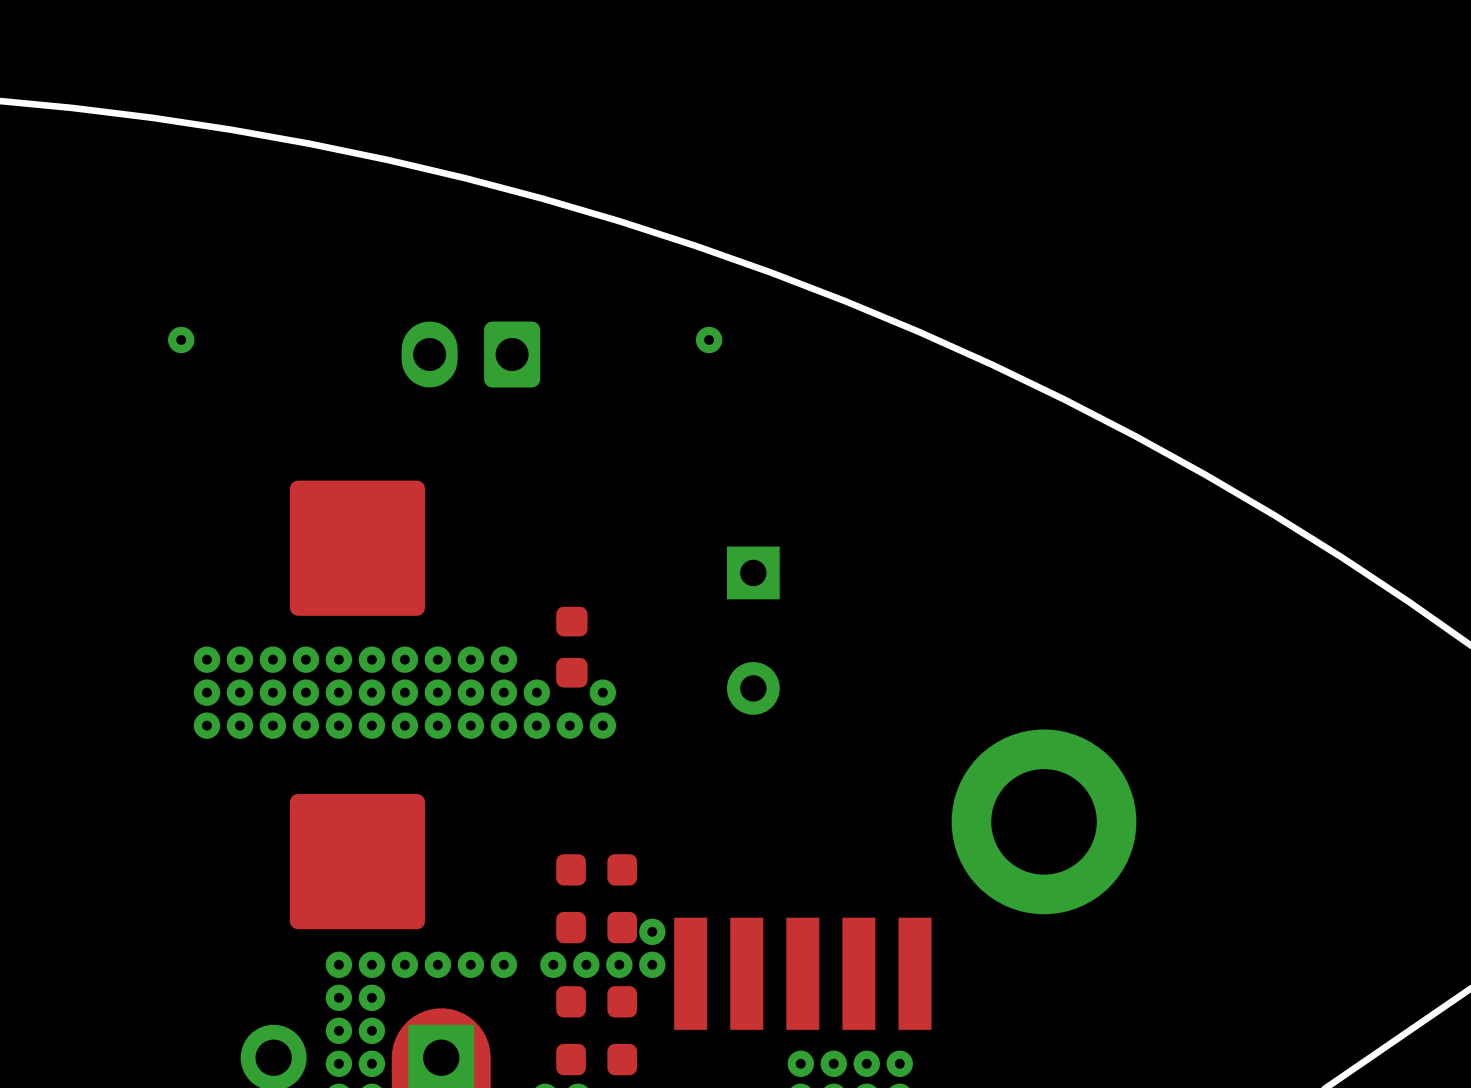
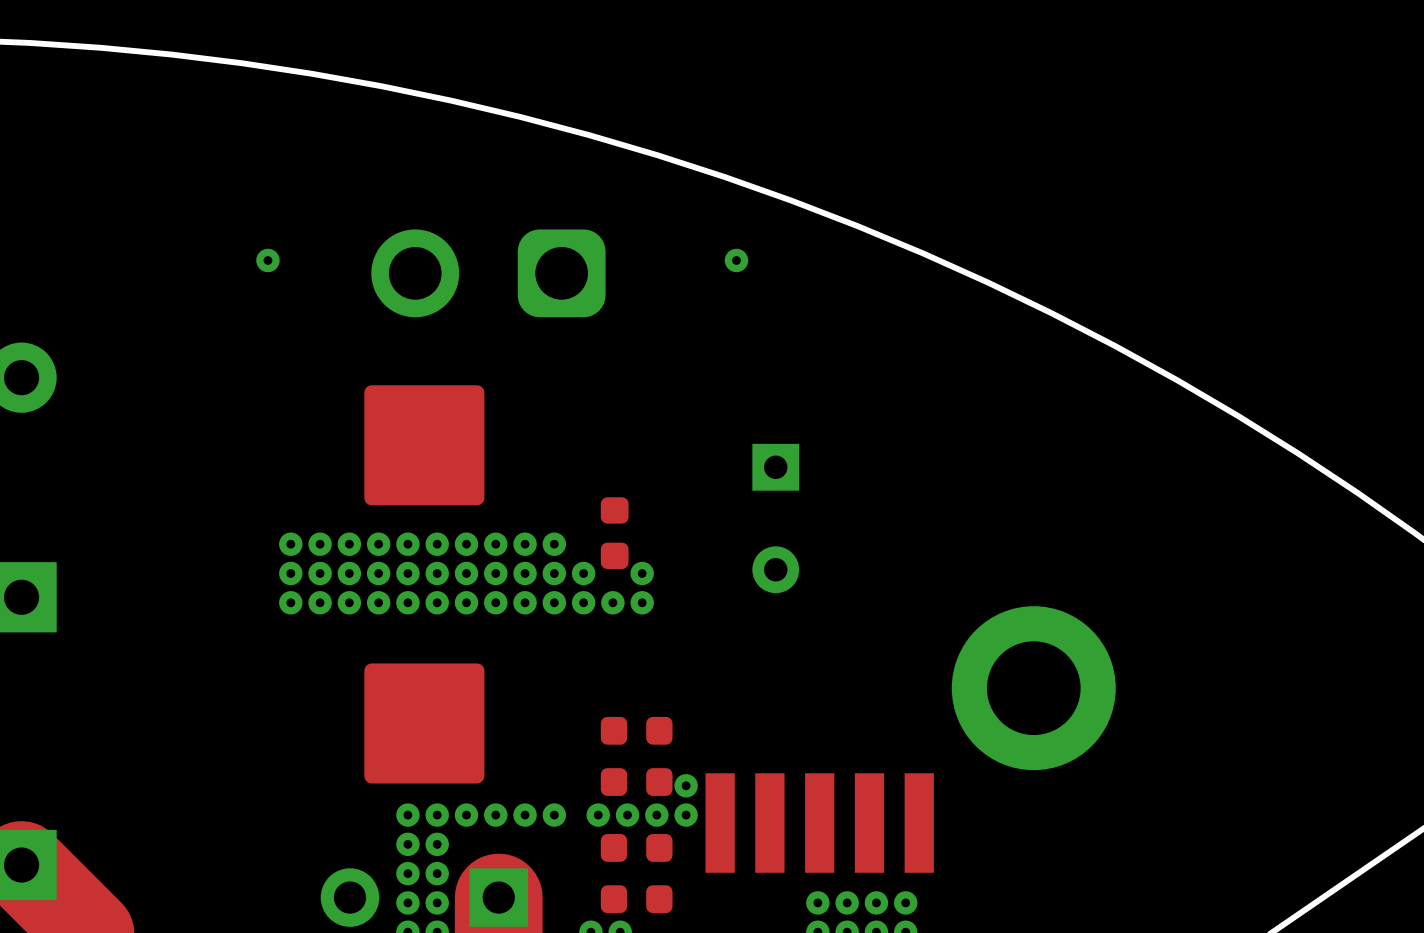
part: none -> (488, 273)
part: (470, 354) -> none

